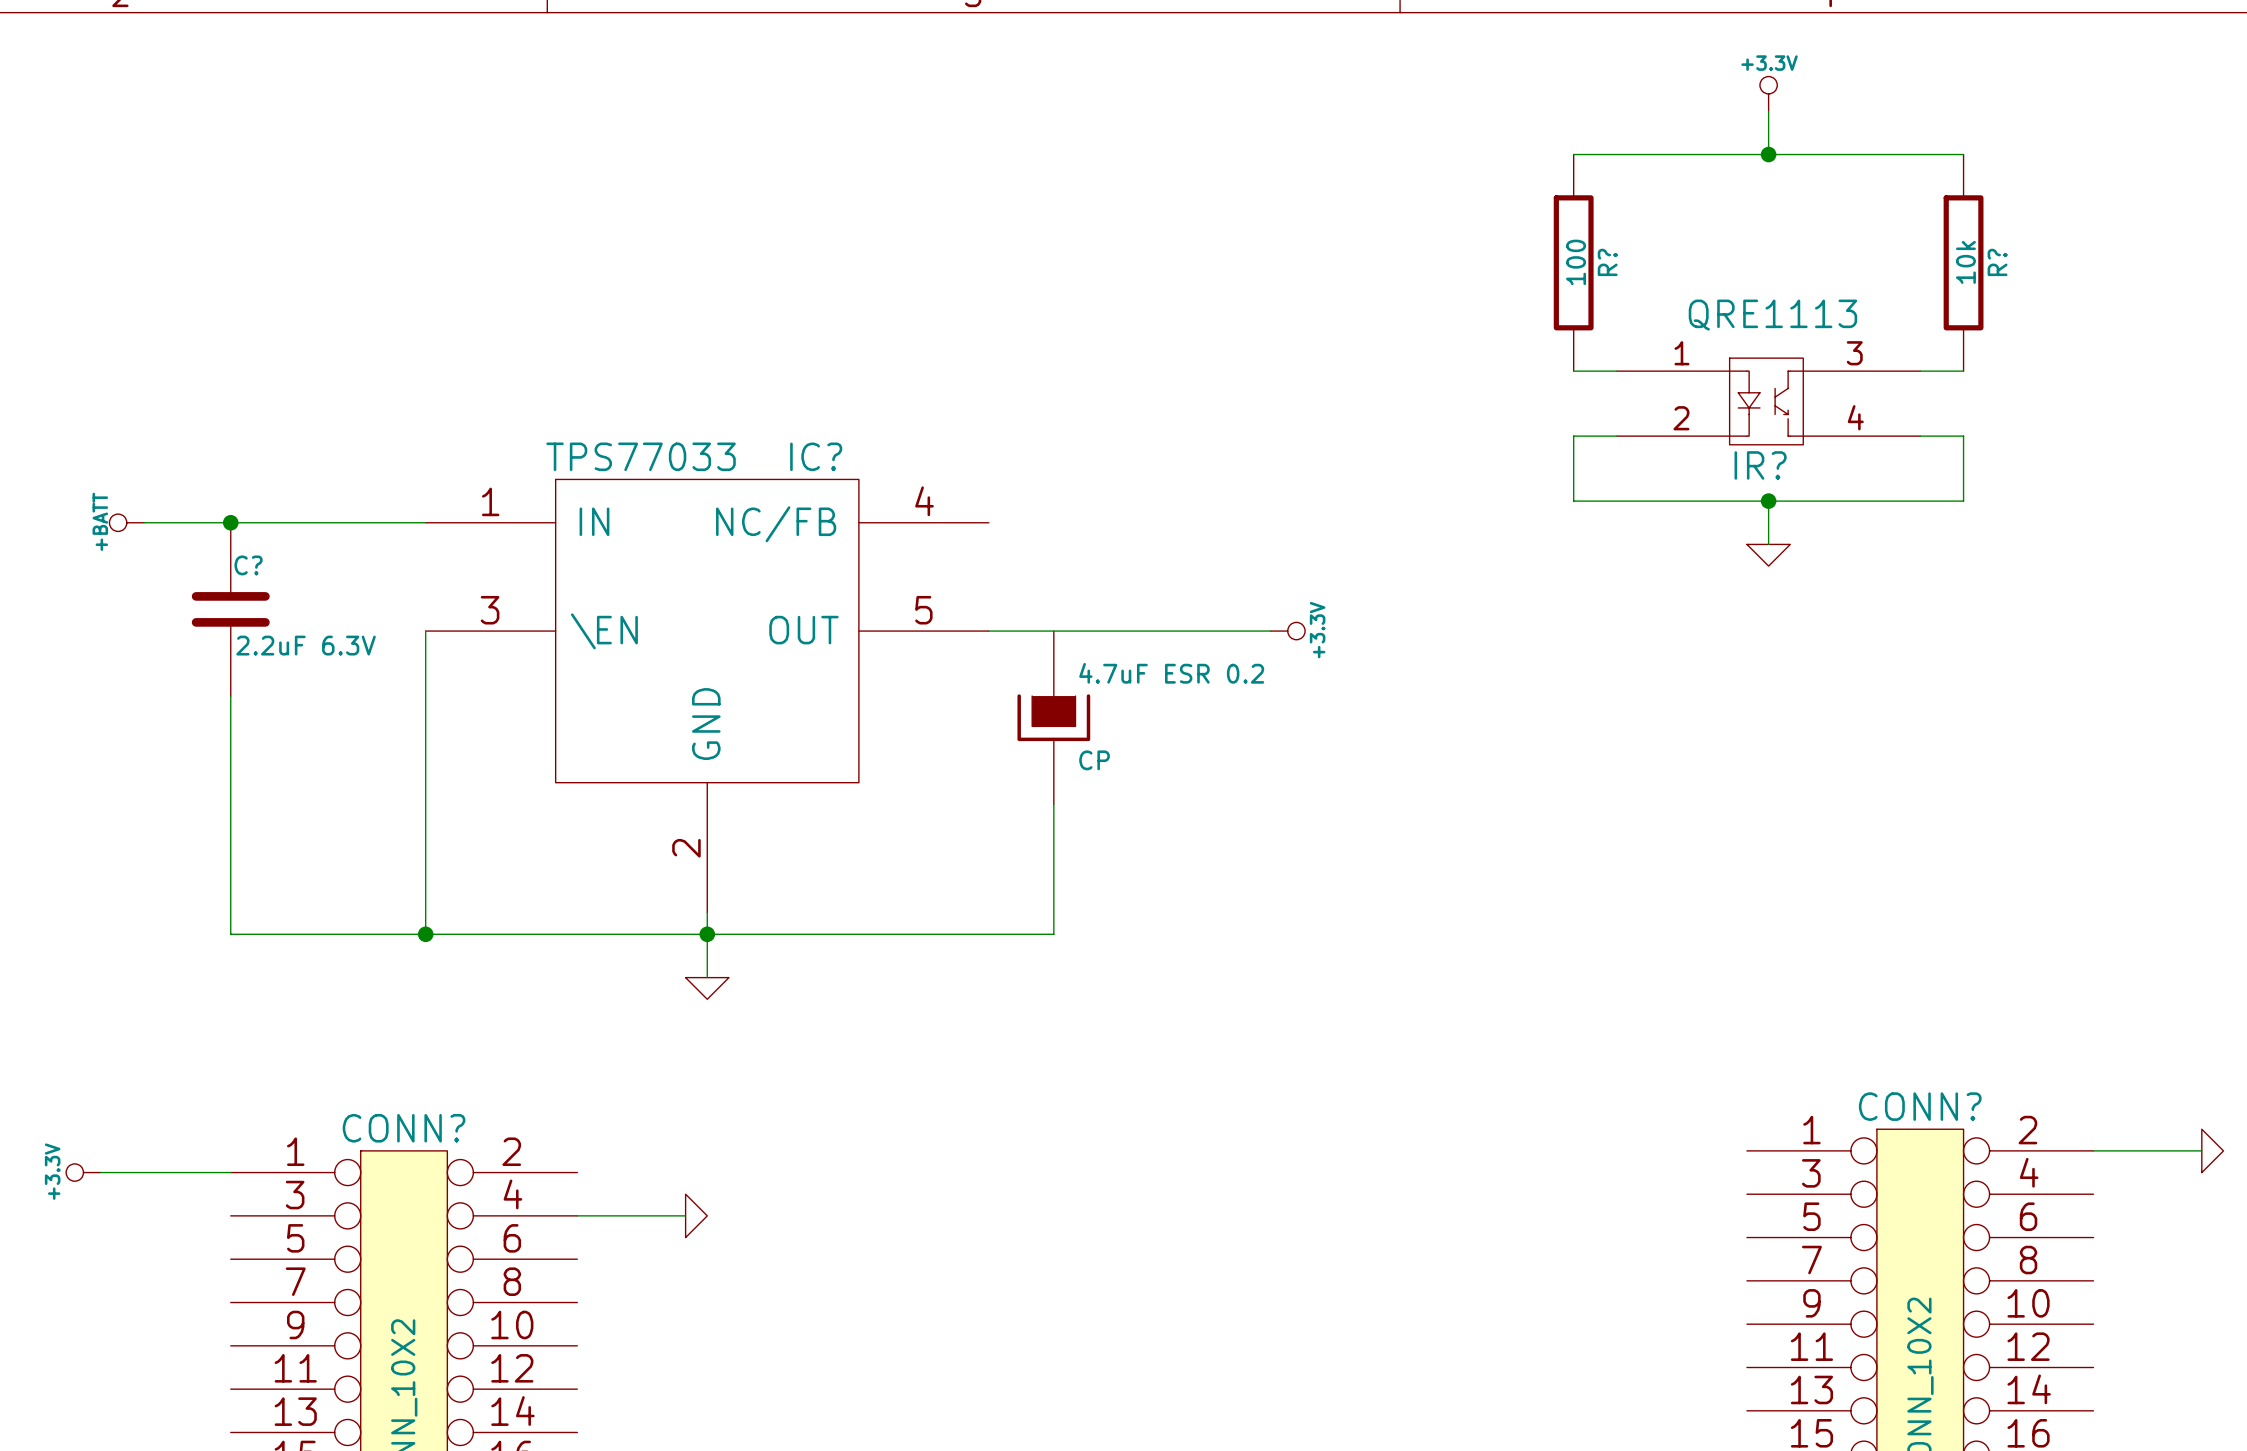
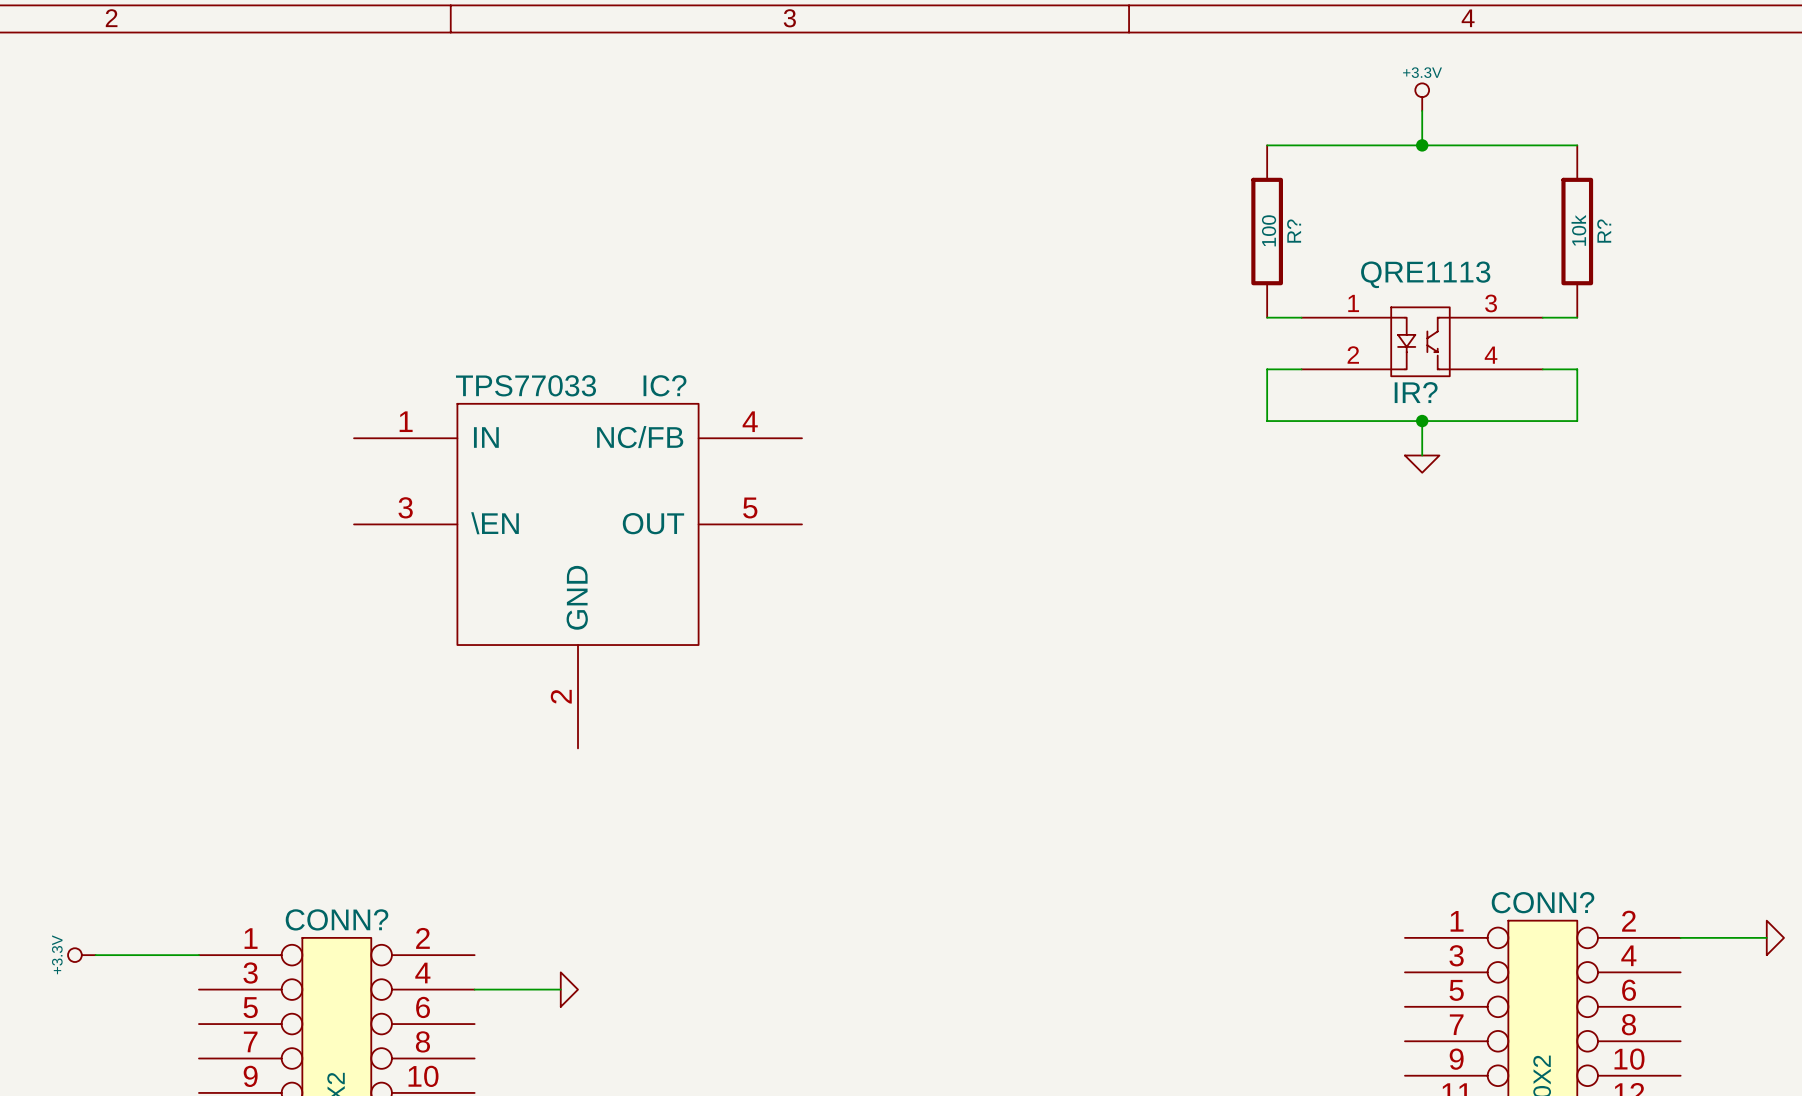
power symbol: +BATT (126, 522) -> none
wire: (144, 522) (425, 522) -> none
junction: (230, 522) -> none
C?: 2.2uF 6.3V (230, 609) -> none
wire: (425, 631) (425, 934) -> none
wire: (988, 631) (1270, 631) -> none
power symbol: +3.3V (1287, 631) -> none
wire: (230, 696) (230, 934) (1053, 934) (1053, 804) -> none
4.7uF ESR 0.2: CP (1053, 717) -> none
wire: (707, 912) (707, 977) -> none
junction: (425, 934) -> none
junction: (707, 934) -> none
power symbol: (707, 988) -> none

